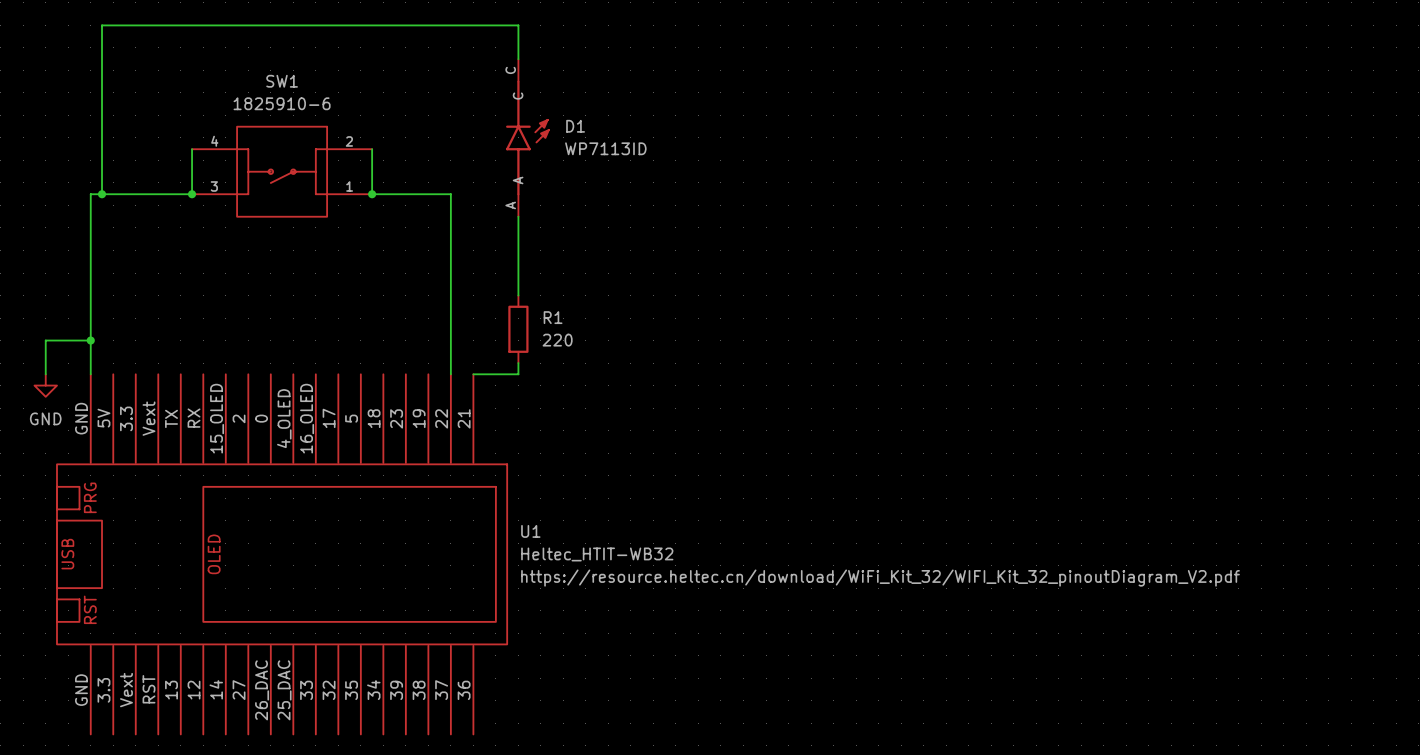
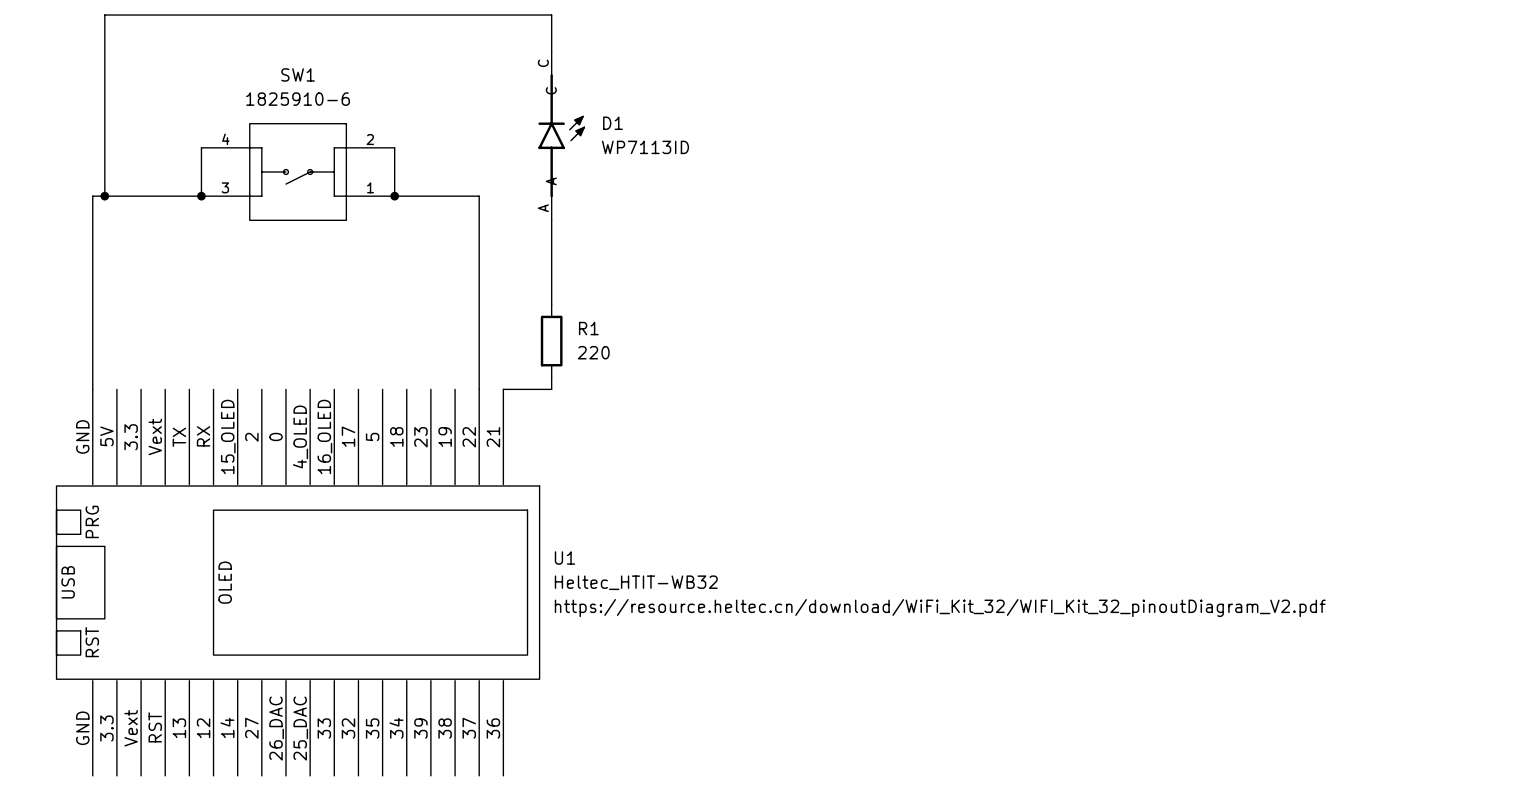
wire: (90, 340) (45, 340) (45, 374) -> none
junction: (90, 340) -> none
power symbol: GND (45, 385) -> none

